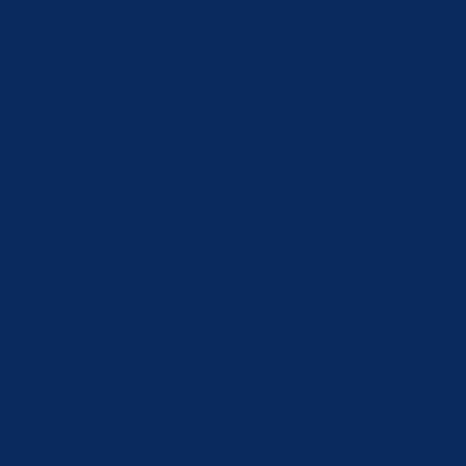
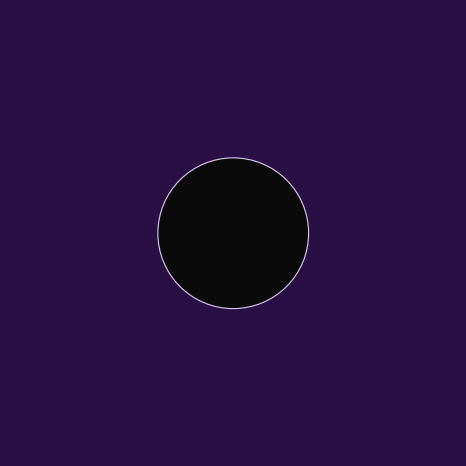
part: none -> (233, 233)

